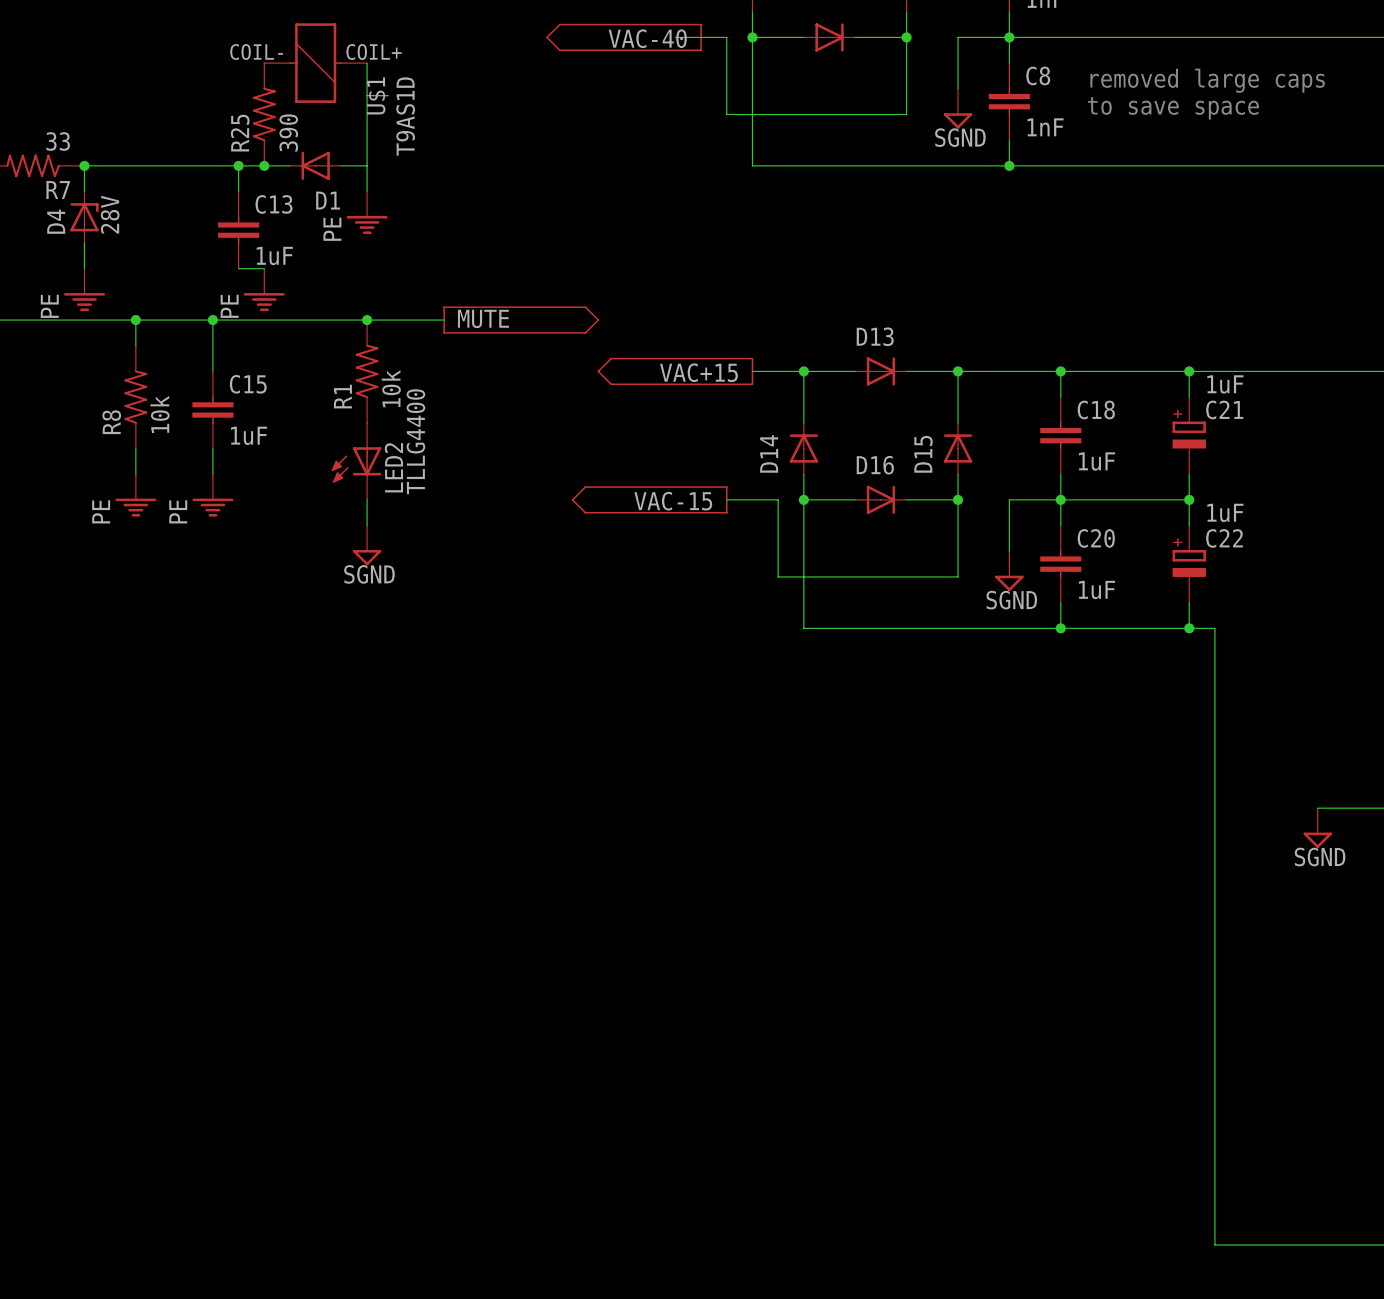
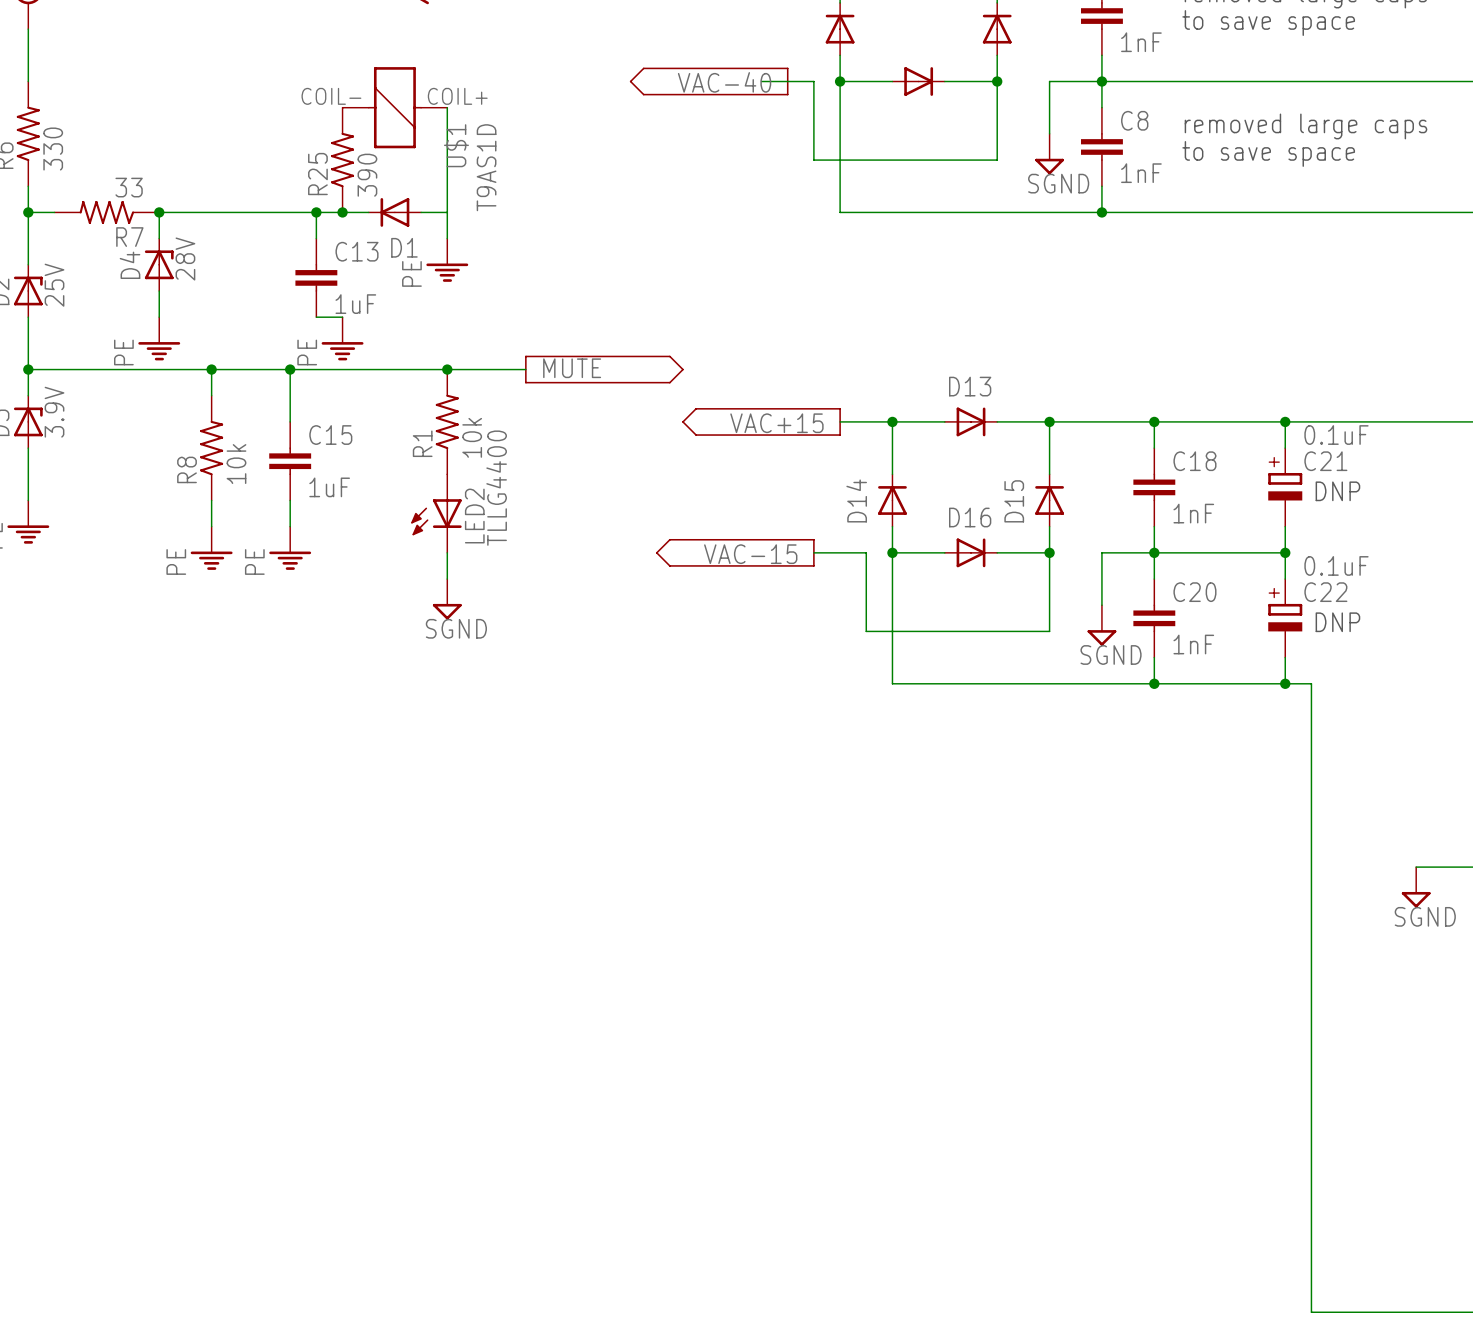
C21 value: 1uF (1225, 384) -> 0.1uF (1336, 435)
text: none -> DNP (1337, 491)
C18 value: 1uF (1096, 461) -> 1nF (1193, 513)
C22 value: 1uF (1225, 512) -> 0.1uF (1336, 565)
text: none -> DNP (1337, 622)
C20 value: 1uF (1096, 589) -> 1nF (1193, 644)

